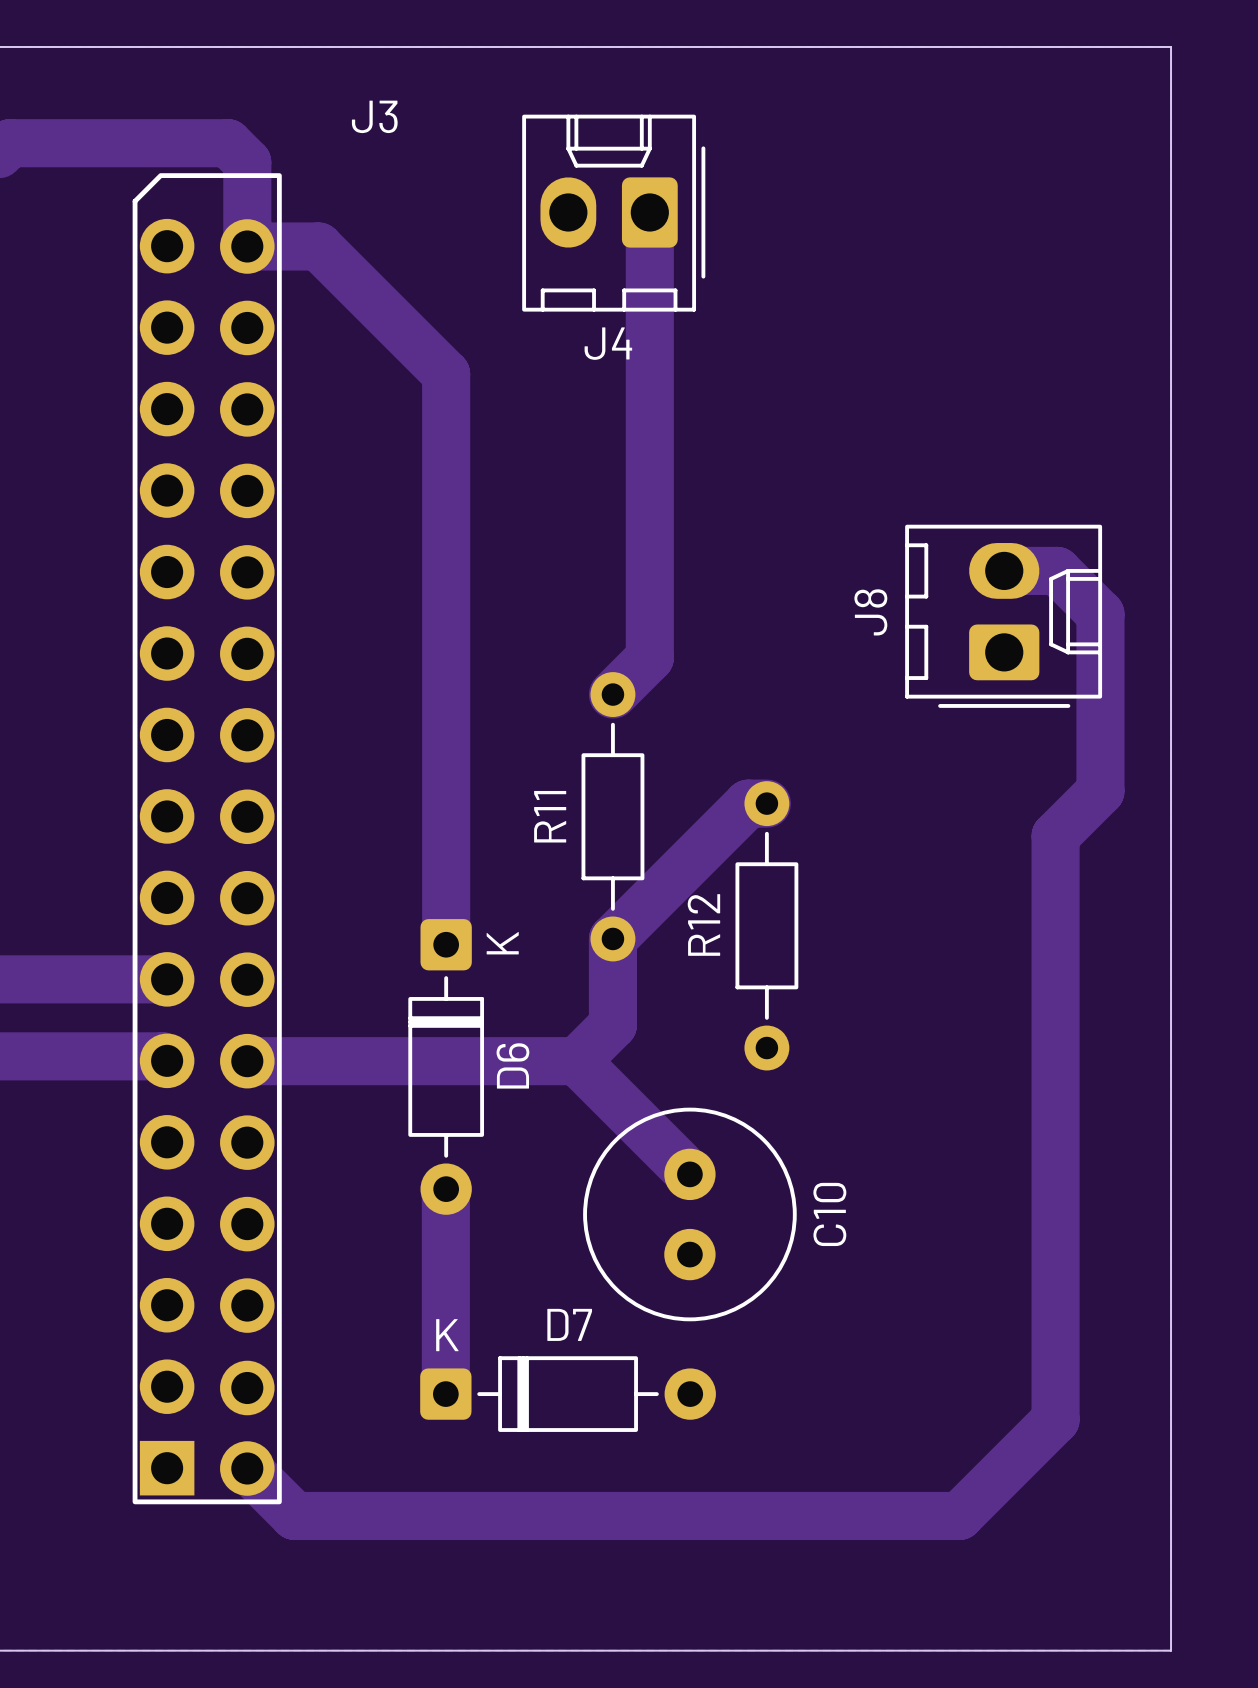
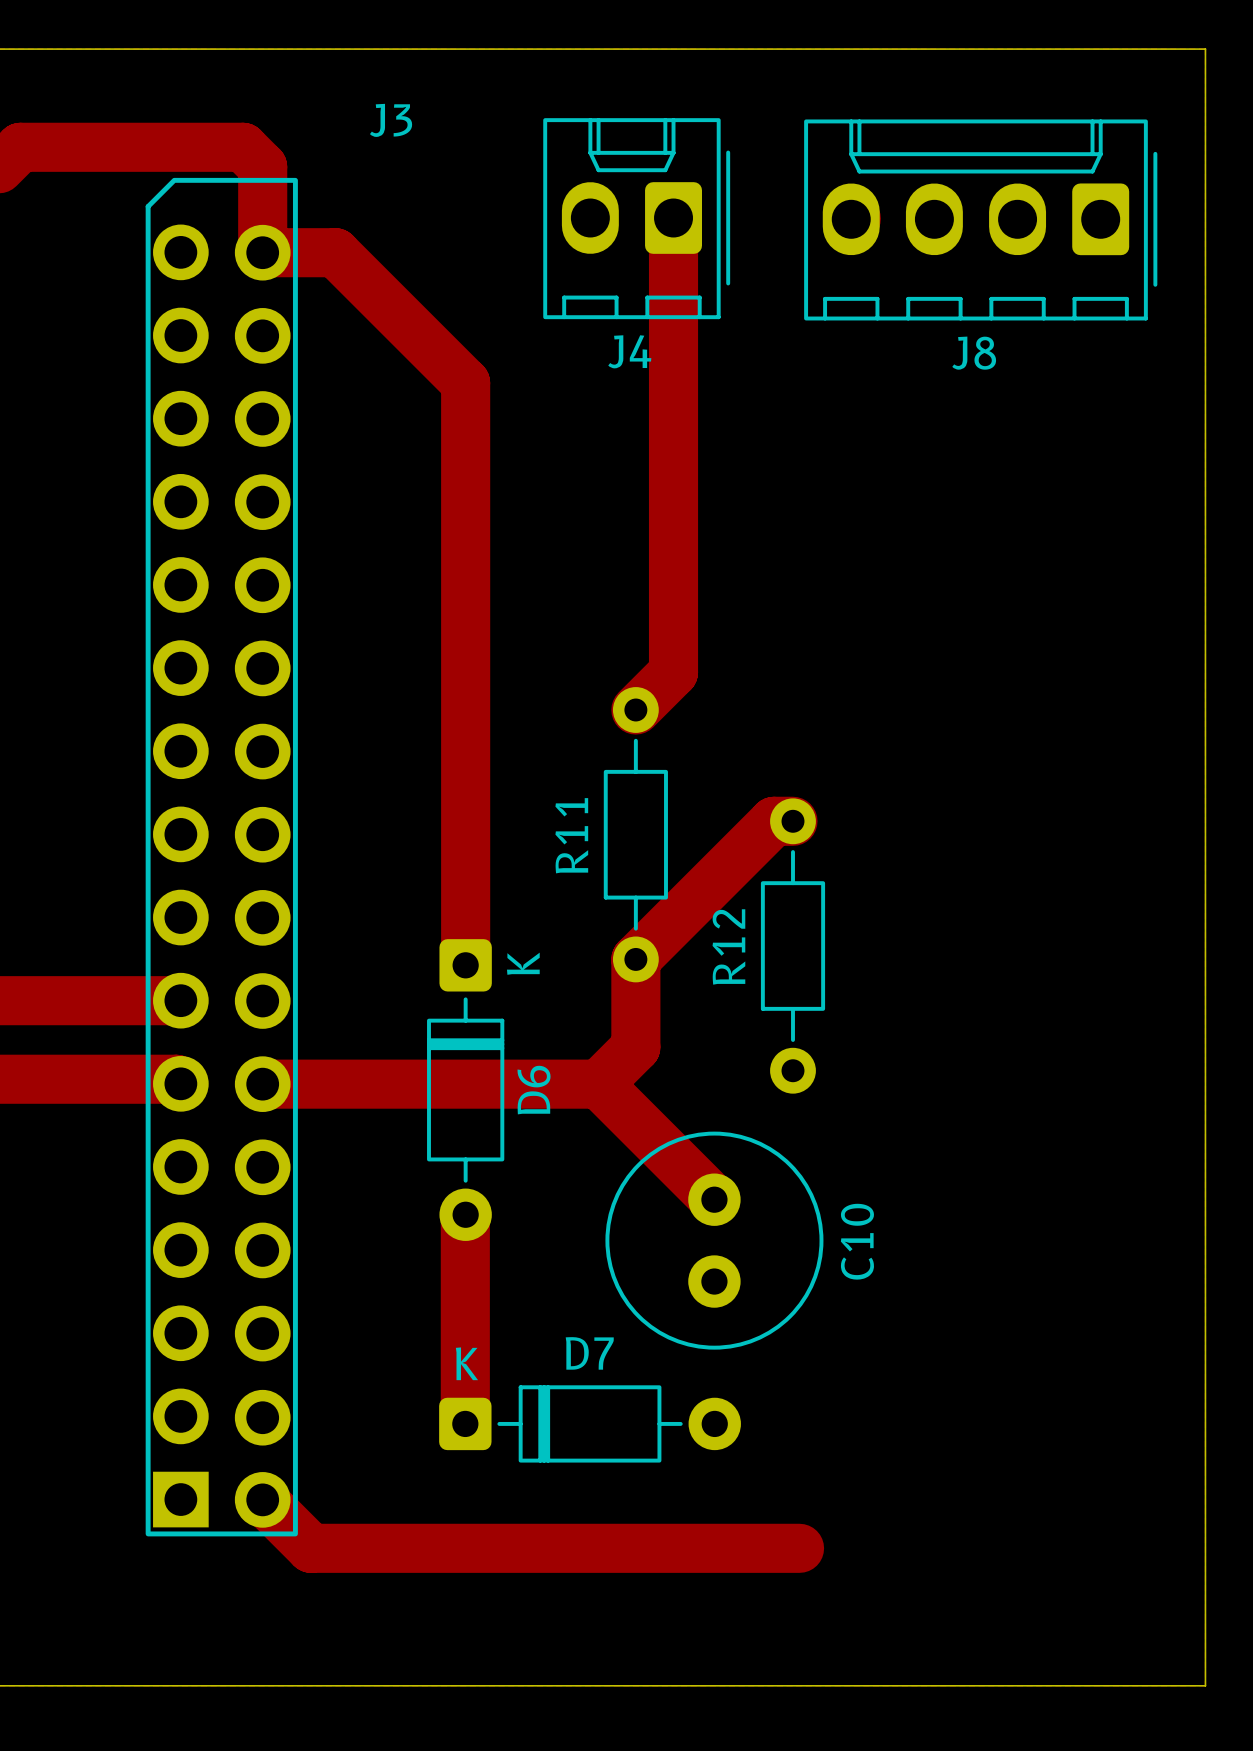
J8 footprint: [905, 524, 1103, 708] -> [804, 119, 1158, 321]
track: (1004, 570) (1057, 570) (1100, 614) (1100, 791) (1055, 836) (1055, 1419) (959, 1515) (773, 1515) -> none
J8 name position: J8 (870, 612) -> J8 (974, 353)

